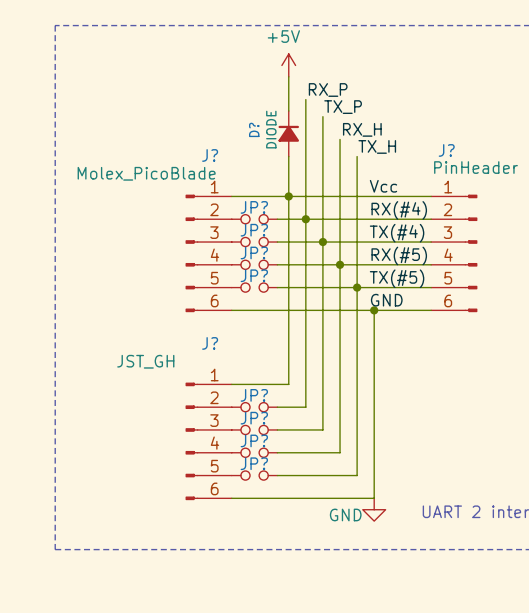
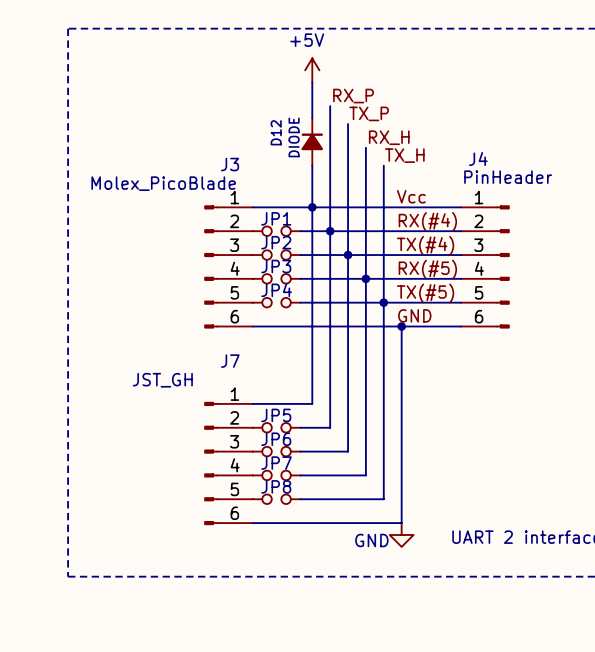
D? name: D? (254, 129) -> D12 (276, 132)
J? name: J? (446, 150) -> J4 (478, 158)
J? name: J? (210, 155) -> J3 (230, 164)
JP? name: JP? (254, 207) -> JP1 (276, 218)
JP? name: JP? (254, 230) -> JP2 (276, 242)
JP? name: JP? (254, 252) -> JP3 (276, 266)
JP? name: JP? (254, 275) -> JP4 (276, 290)
J? name: J? (210, 343) -> J7 (230, 361)
JP? name: JP? (254, 395) -> JP5 (276, 415)
JP? name: JP? (254, 418) -> JP6 (276, 439)
JP? name: JP? (254, 440) -> JP7 (276, 463)
JP? name: JP? (254, 463) -> JP8 (276, 486)

